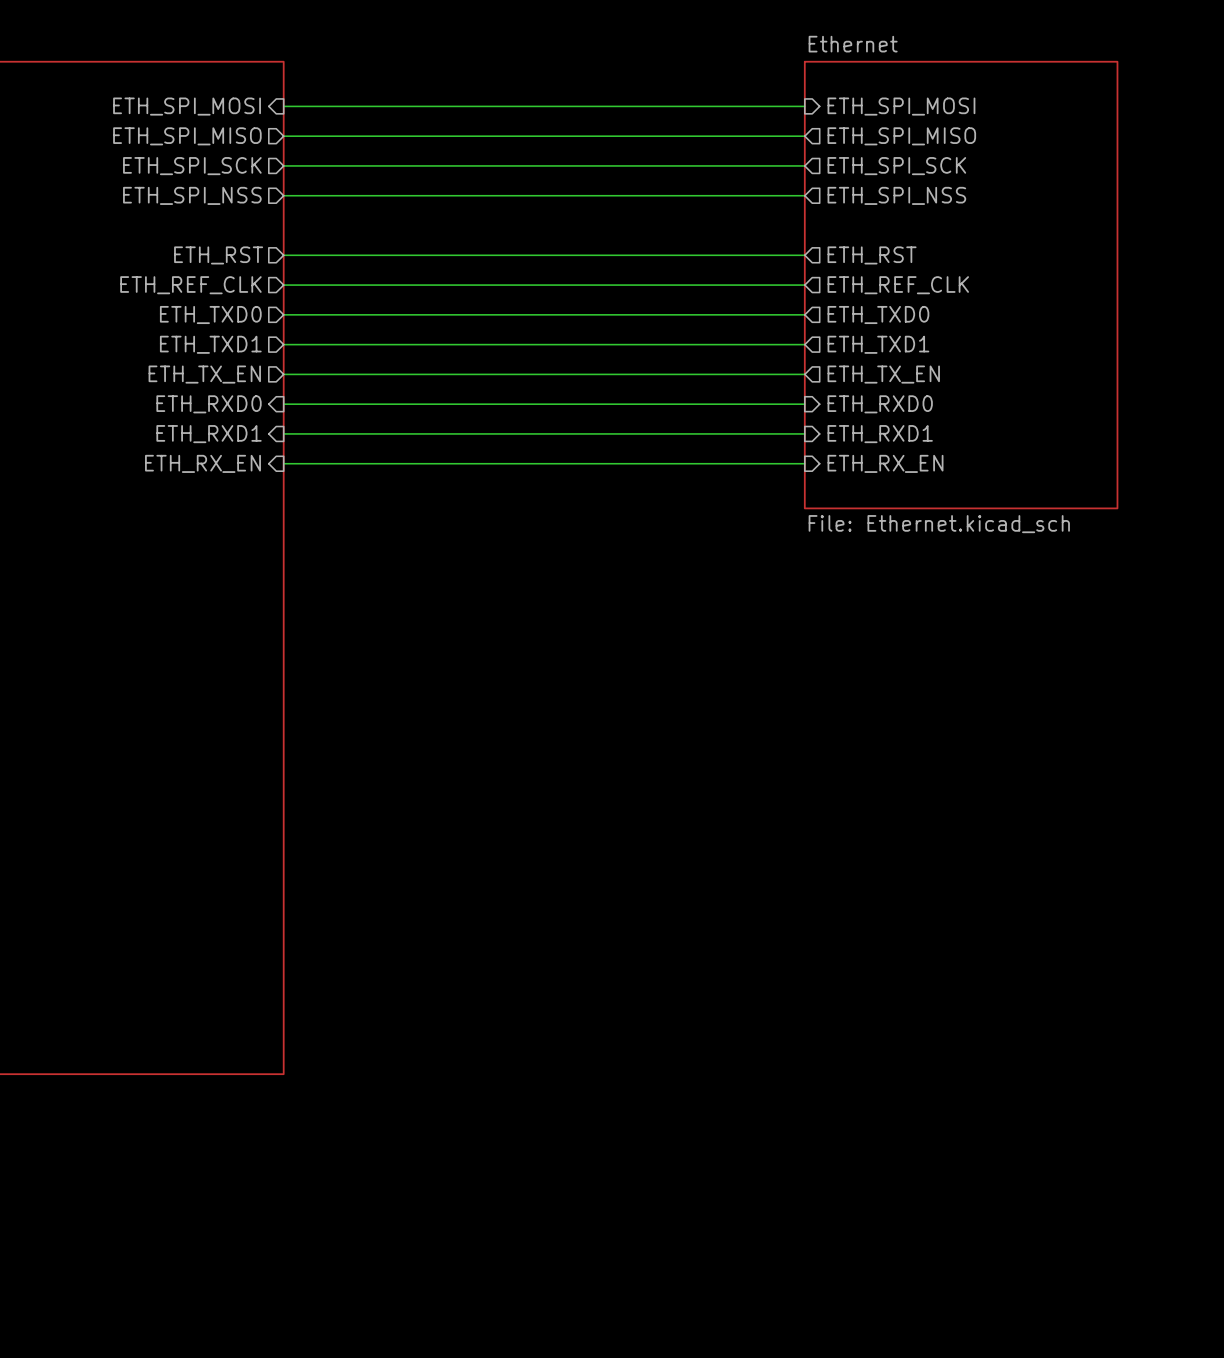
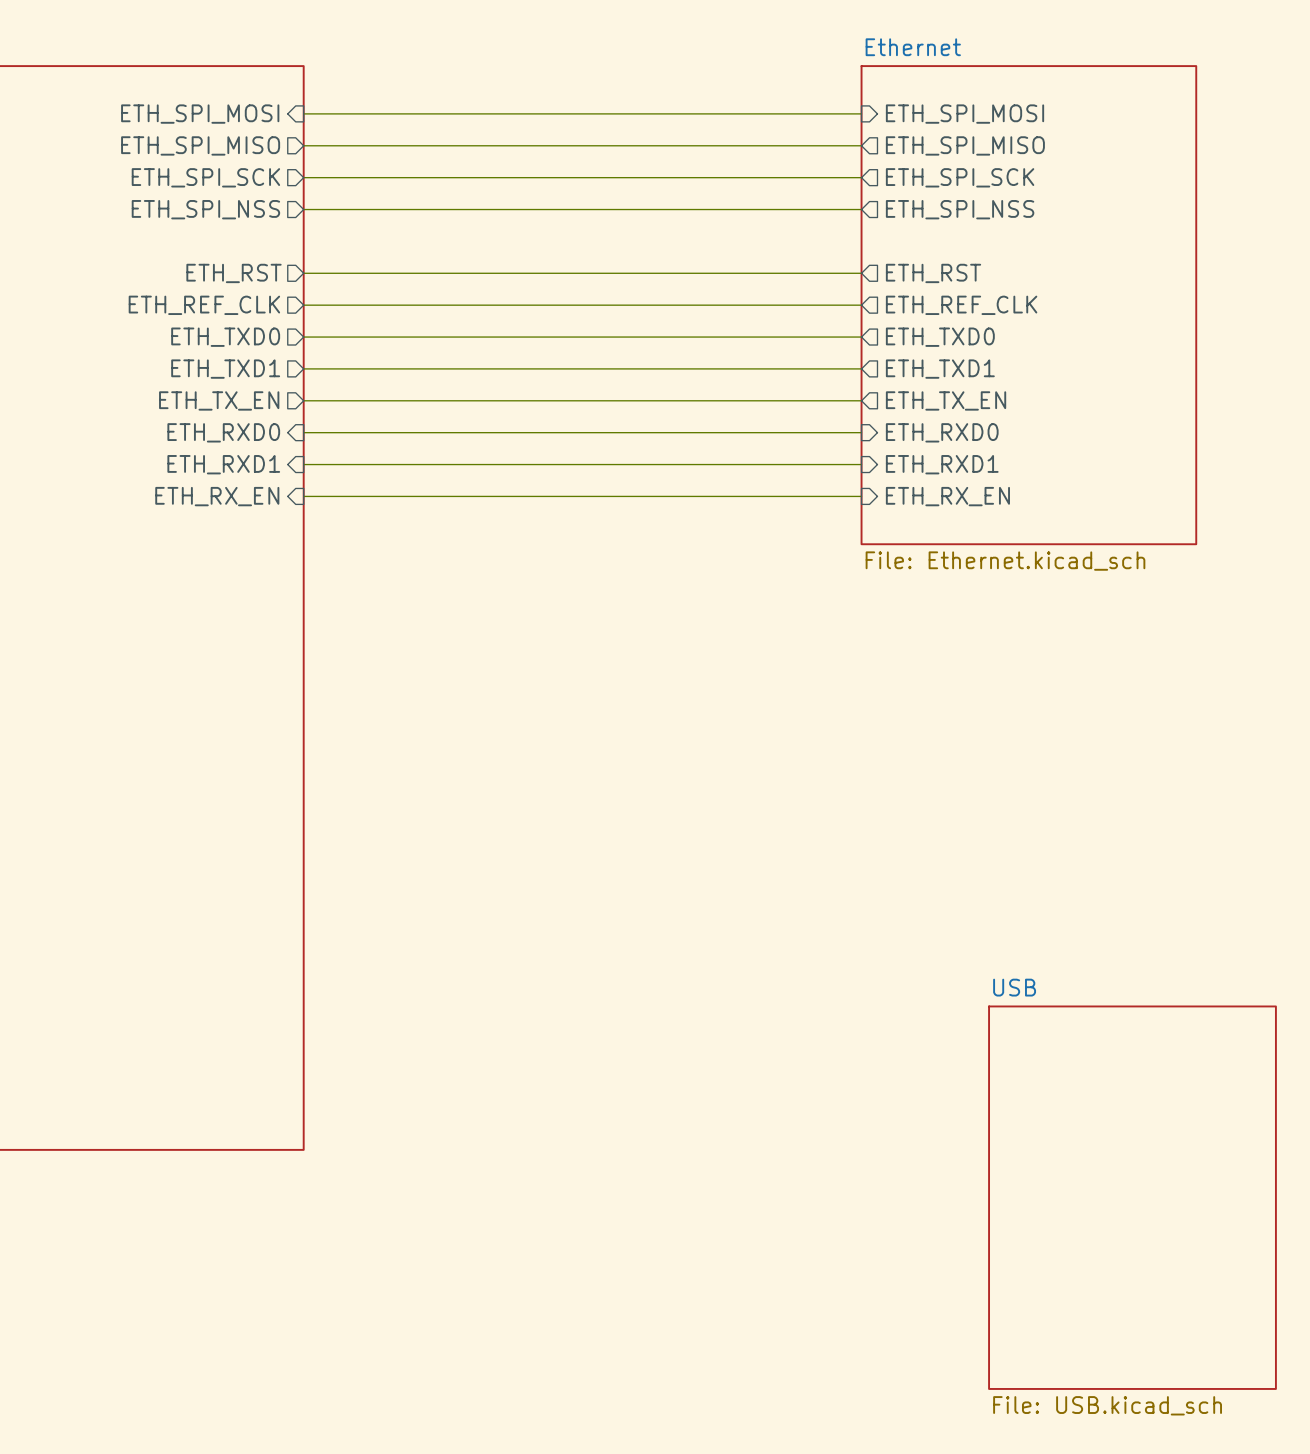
sheet USB: none -> File: USB.kicad_sch (1132, 1197)

